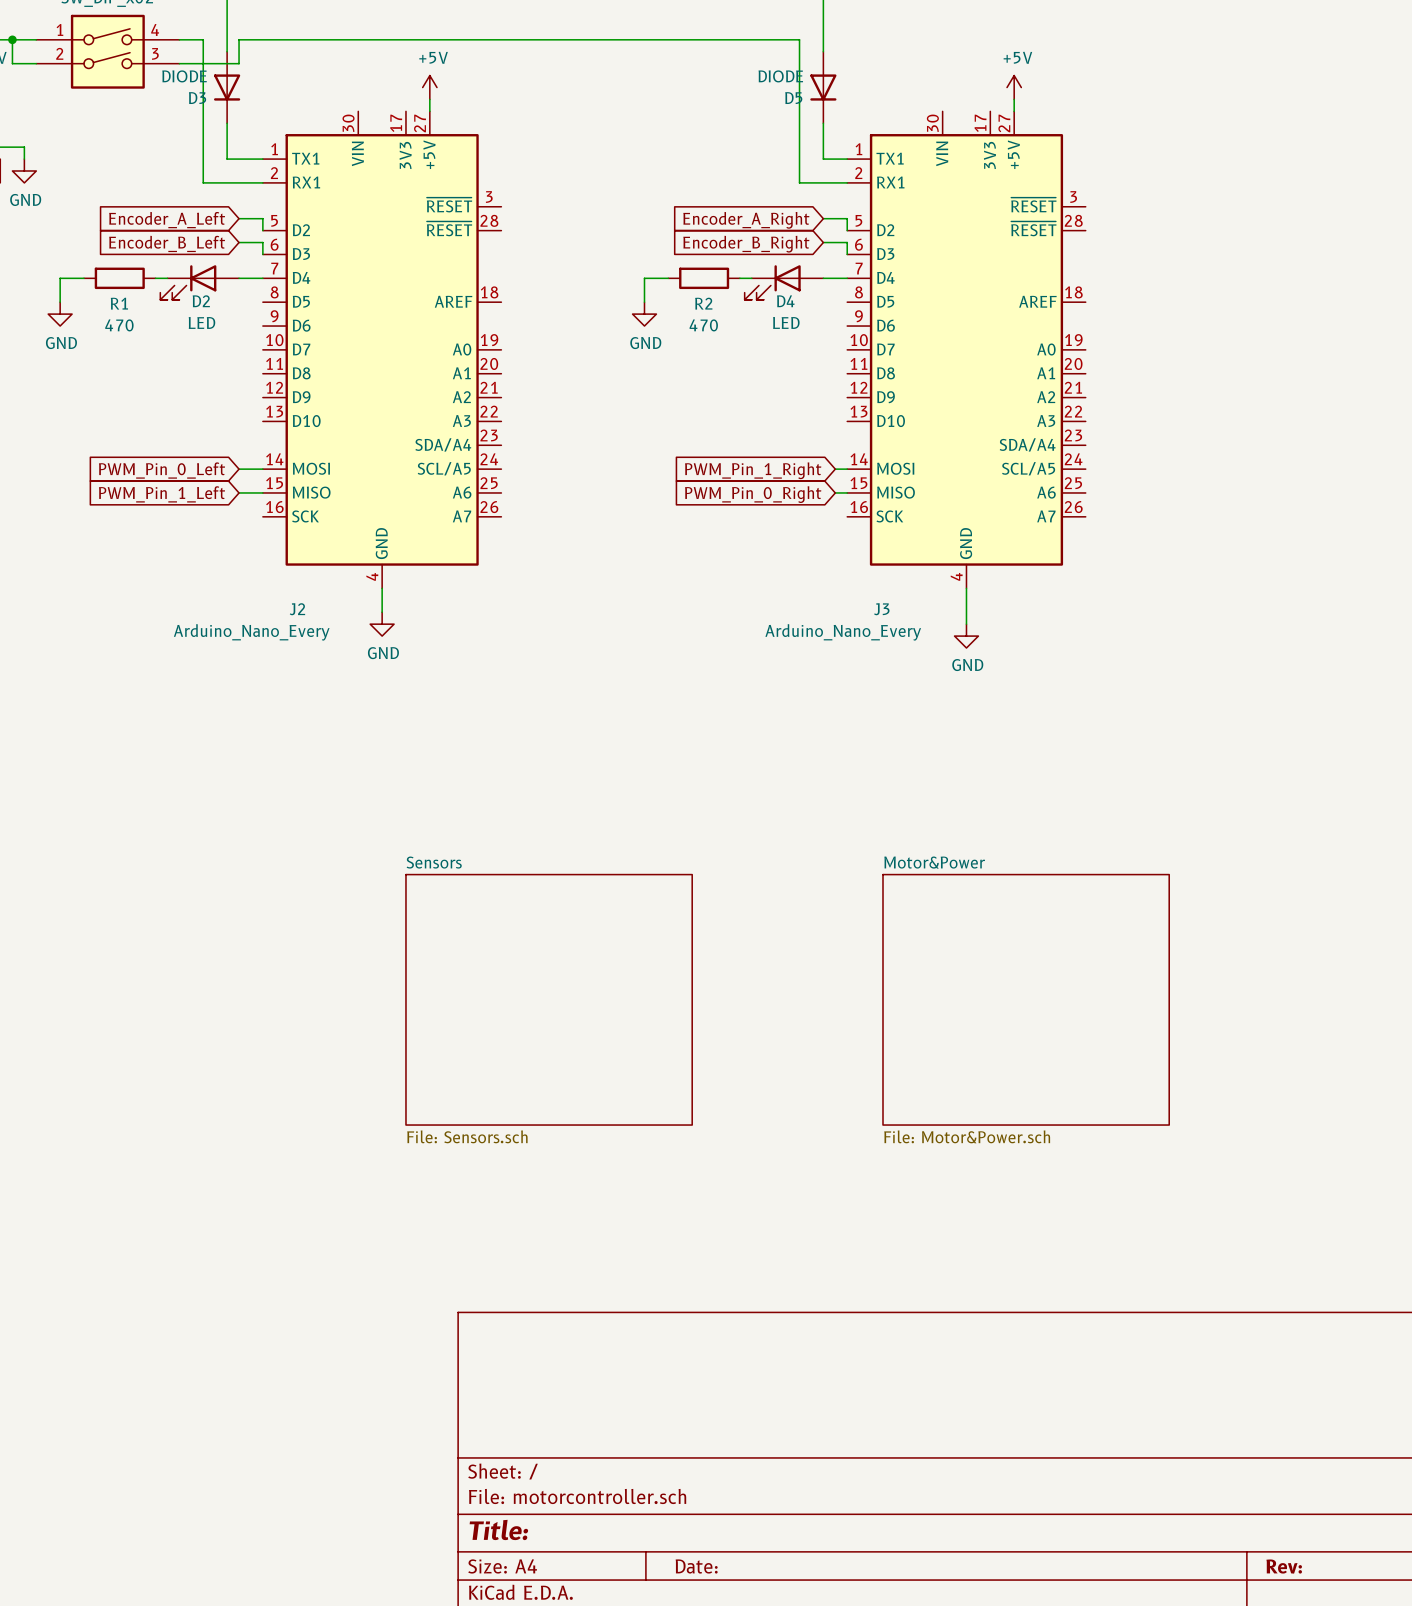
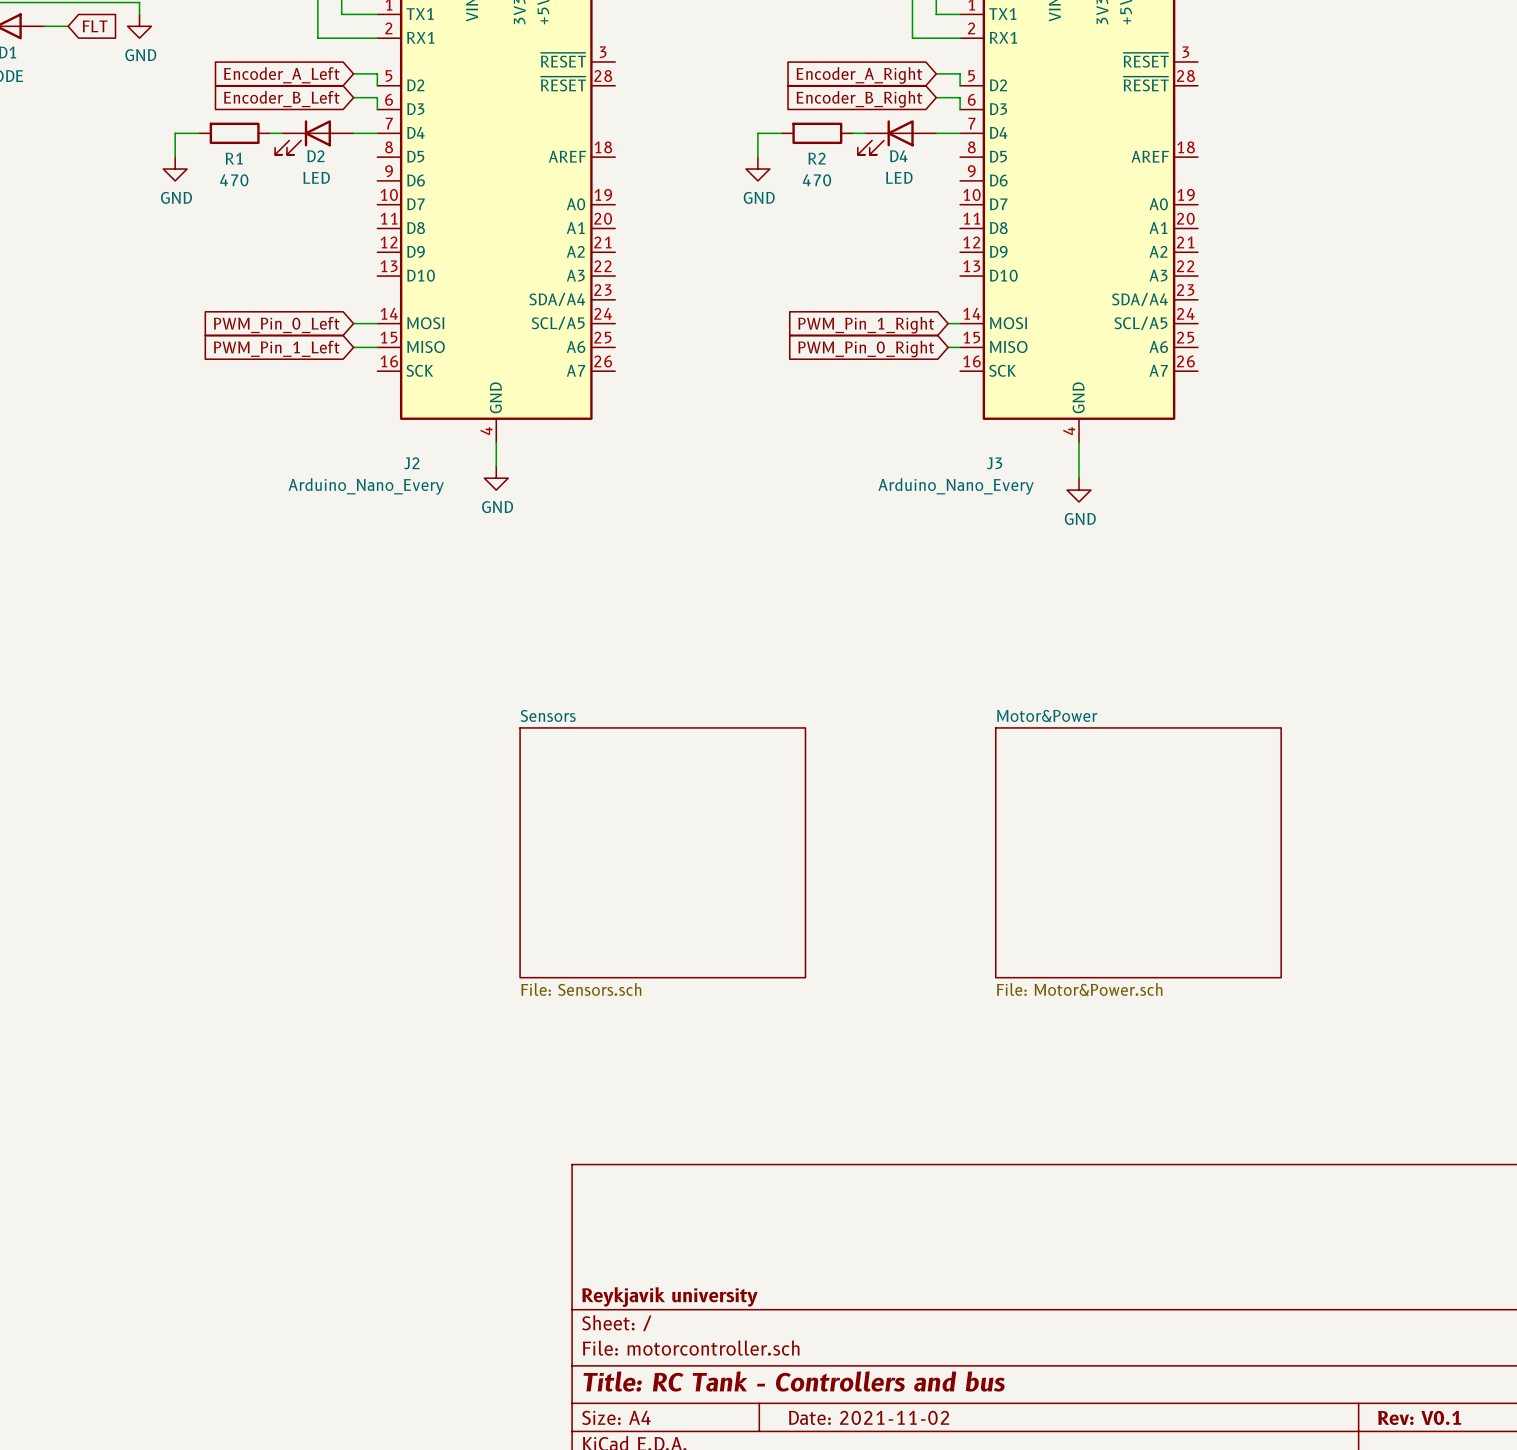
title block: none -> Reykjavik university (669, 1297)
title block: Title: (498, 1529) -> Title: RC Tank - Controllers and bus (794, 1381)
title block: Date: (696, 1566) -> Date: 2021-11-02 (869, 1417)
title block: Rev: (1284, 1566) -> Rev: V0.1 (1419, 1417)

